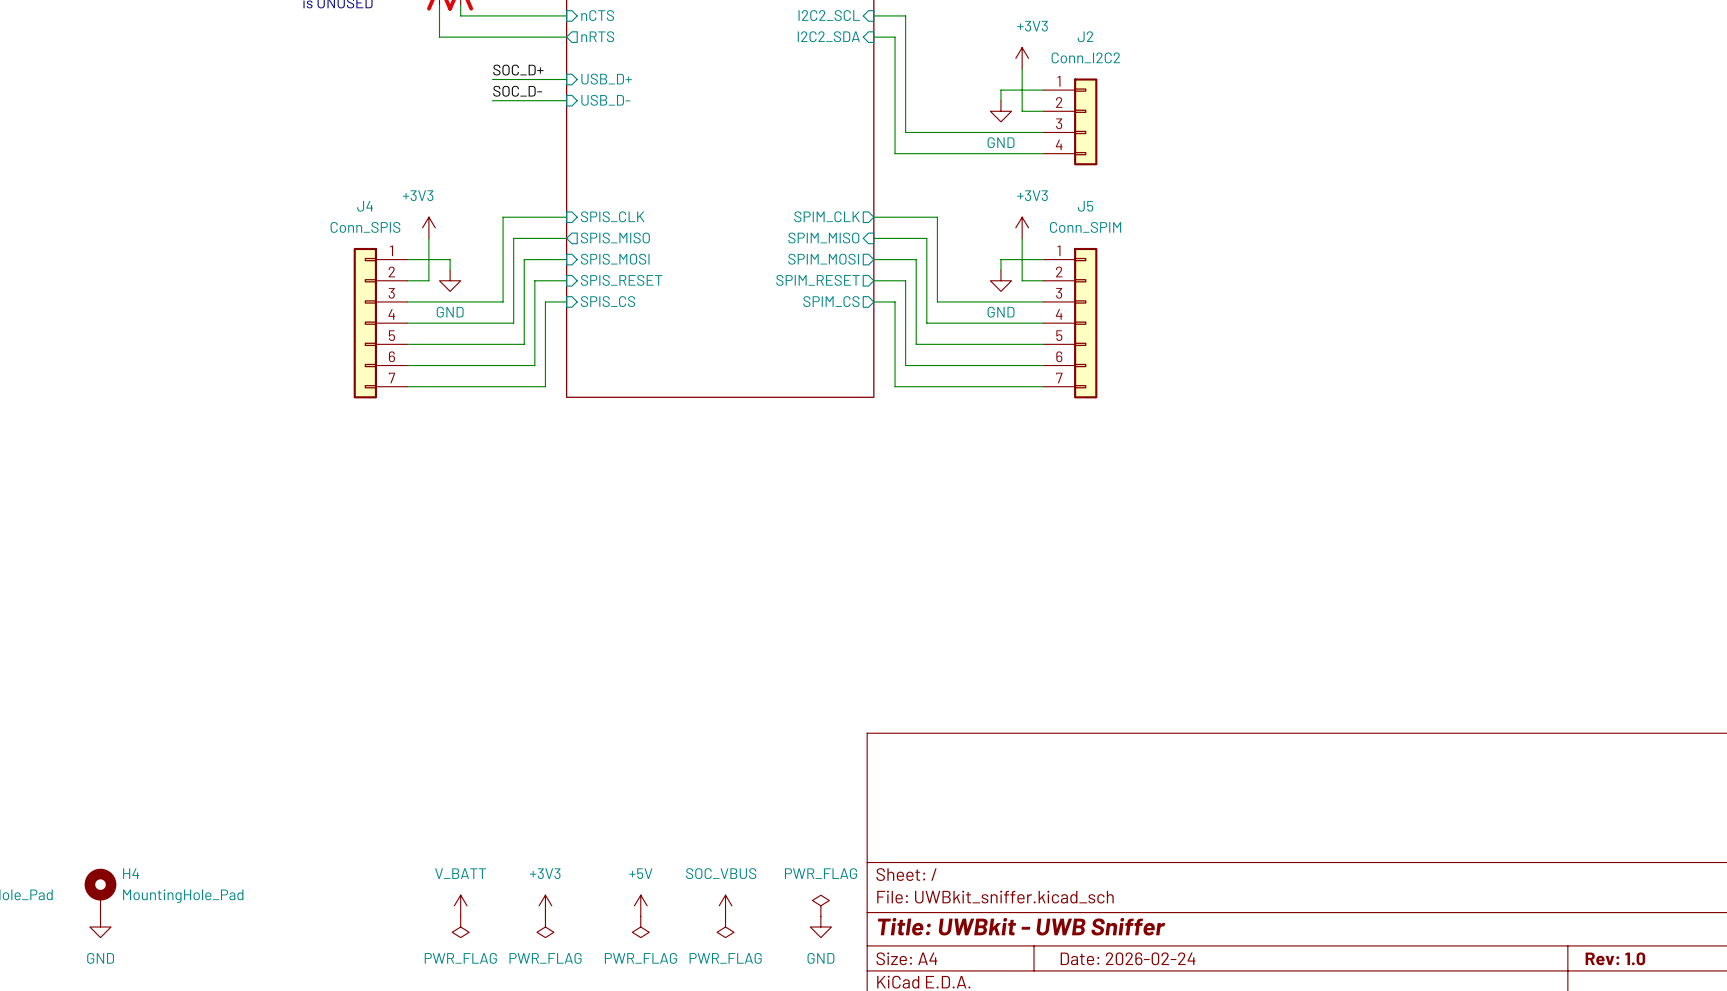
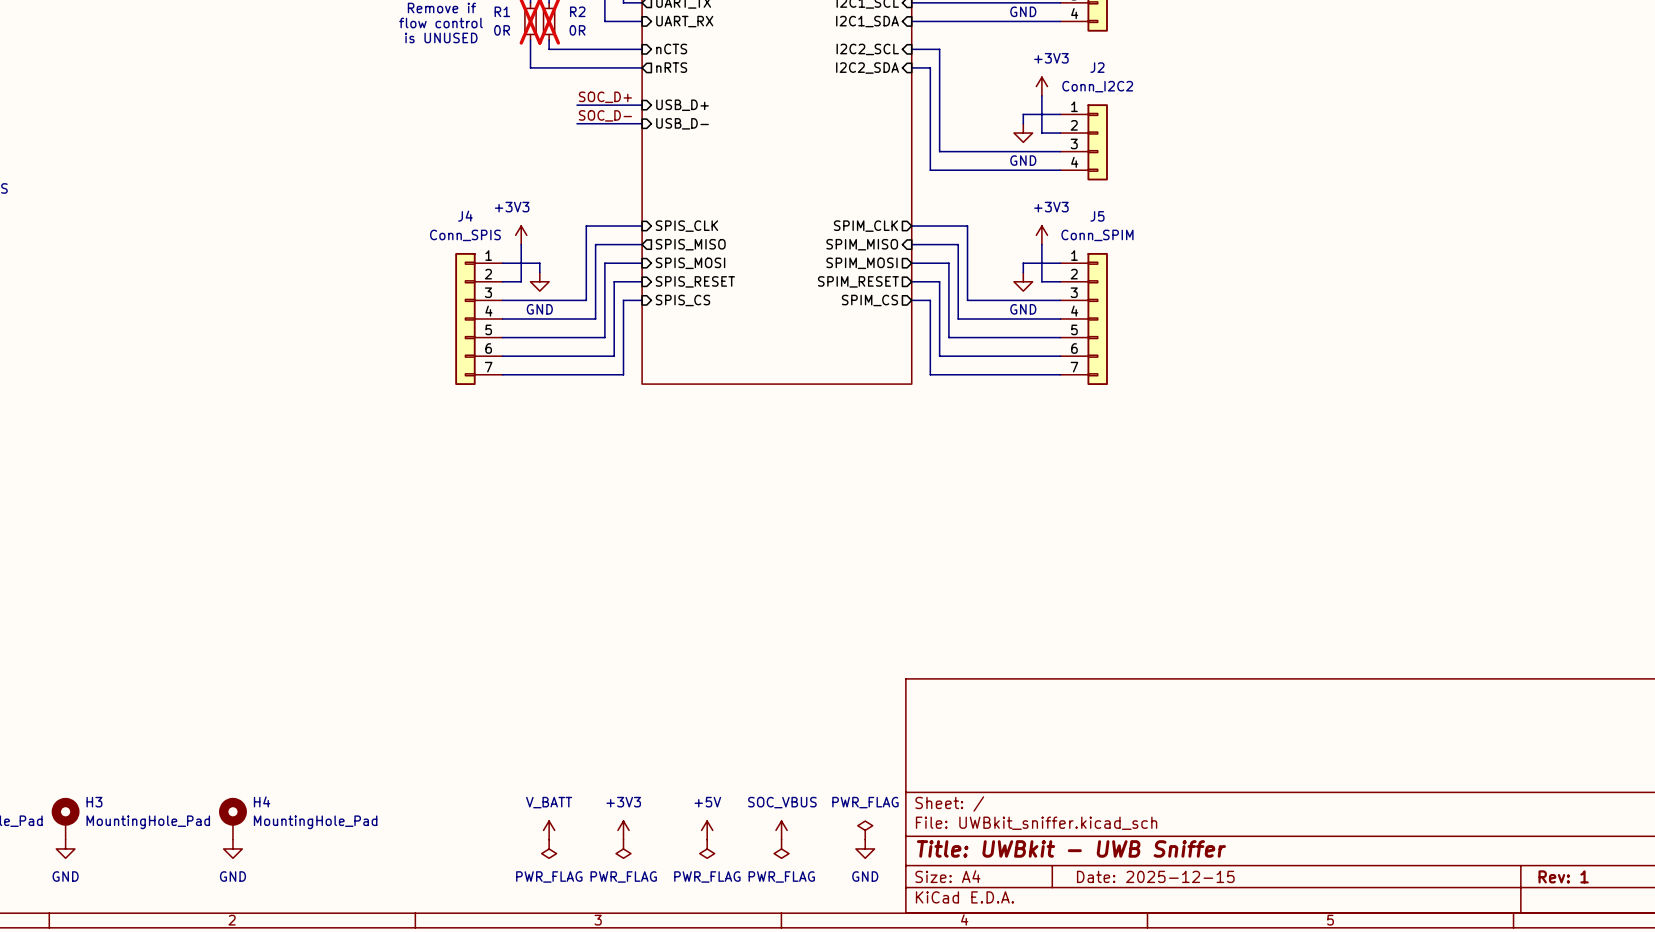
title block: Date: 2026-02-24 (1128, 958) -> Date: 2025-12-15 (1155, 876)
title block: Rev: 1.0 (1615, 958) -> Rev: 1 (1563, 876)

